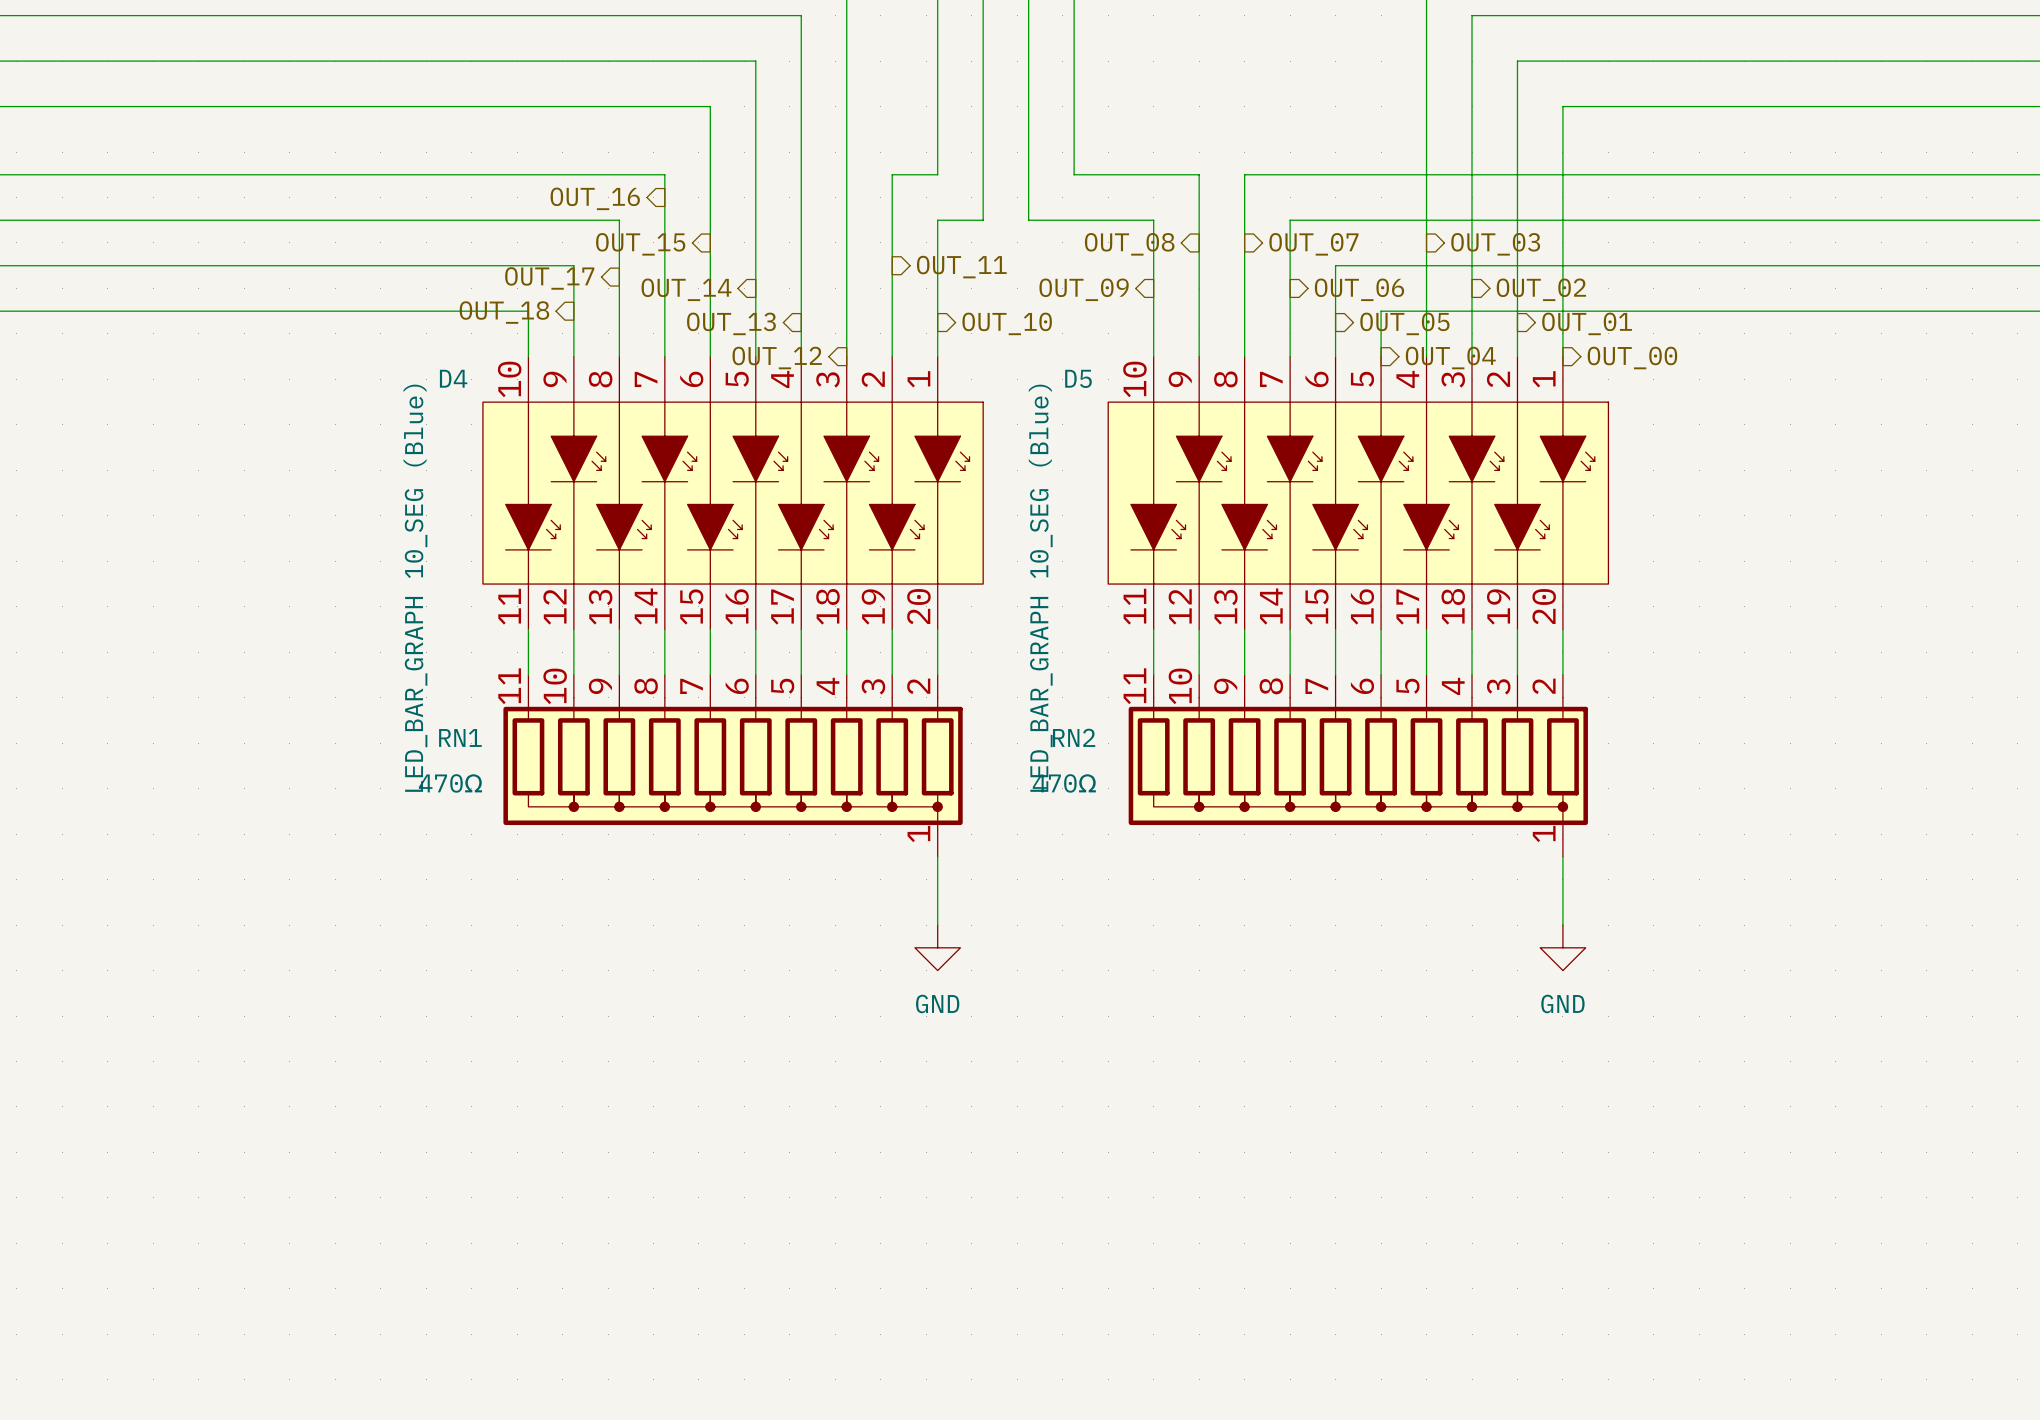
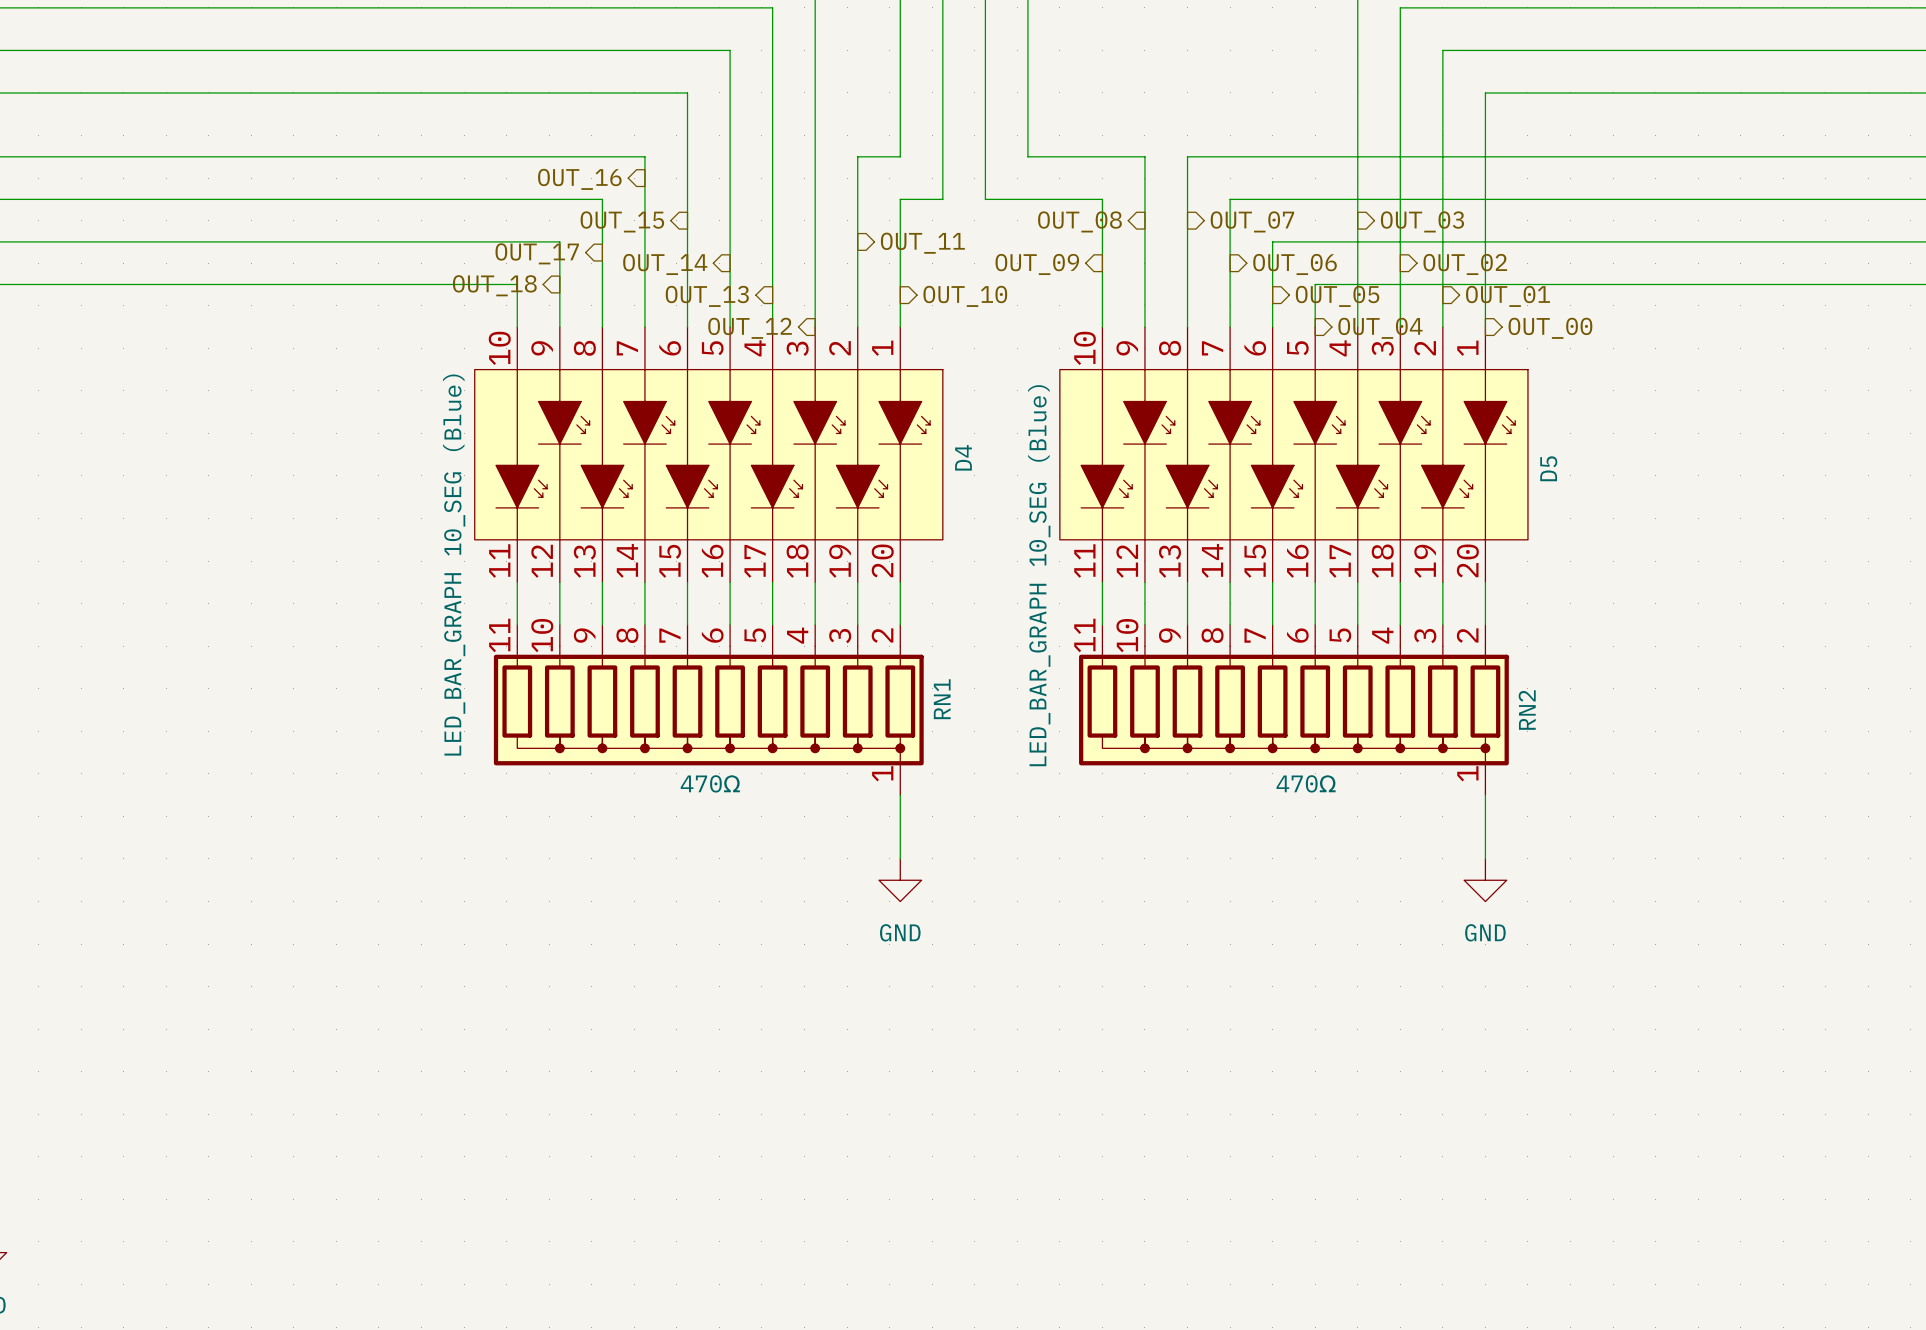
D4 name rotation: 0° (453, 378) -> 90° counterclockwise (963, 457)
D4 name position: D4 (453, 378) -> D4 (963, 457)
D5 name rotation: 0° (1078, 378) -> 90° counterclockwise (1548, 468)
D5 name position: D5 (1078, 378) -> D5 (1548, 468)
D4 value position: LED_BAR_GRAPH 10_SEG (Blue) (415, 588) -> LED_BAR_GRAPH 10_SEG (Blue) (454, 565)
D5 value position: LED_BAR_GRAPH 10_SEG (Blue) (1040, 588) -> LED_BAR_GRAPH 10_SEG (Blue) (1039, 575)
RN1 name rotation: 0° (460, 737) -> 90° counterclockwise (942, 699)
RN1 name position: RN1 (460, 737) -> RN1 (942, 699)
RN2 name rotation: 0° (1074, 737) -> 90° counterclockwise (1527, 710)
RN2 name position: RN2 (1074, 737) -> RN2 (1527, 710)
RN1 value position: 470Ω (450, 783) -> 470Ω (710, 783)
RN2 value position: 470Ω (1064, 783) -> 470Ω (1306, 783)

